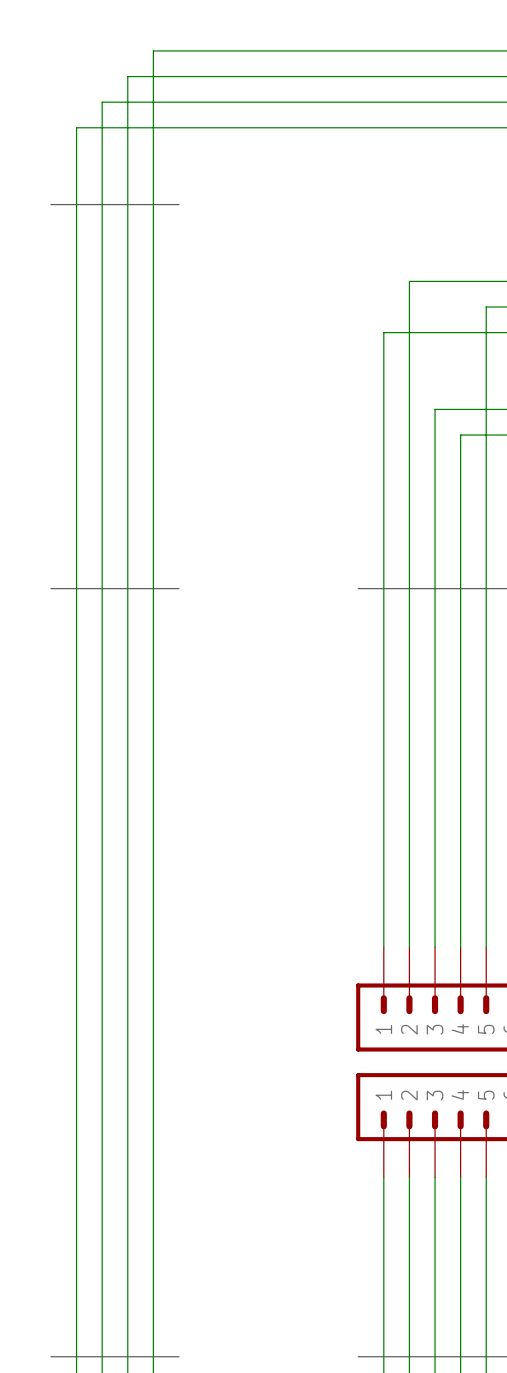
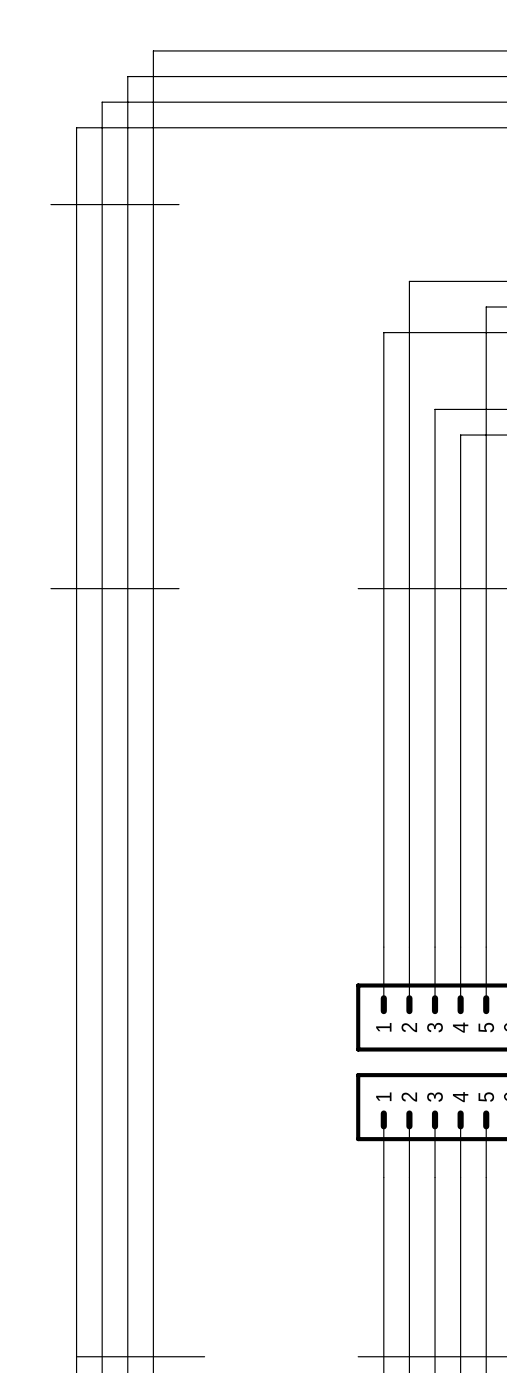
bus: (50, 1356) (76, 1356) -> (178, 1356) (204, 1356)

